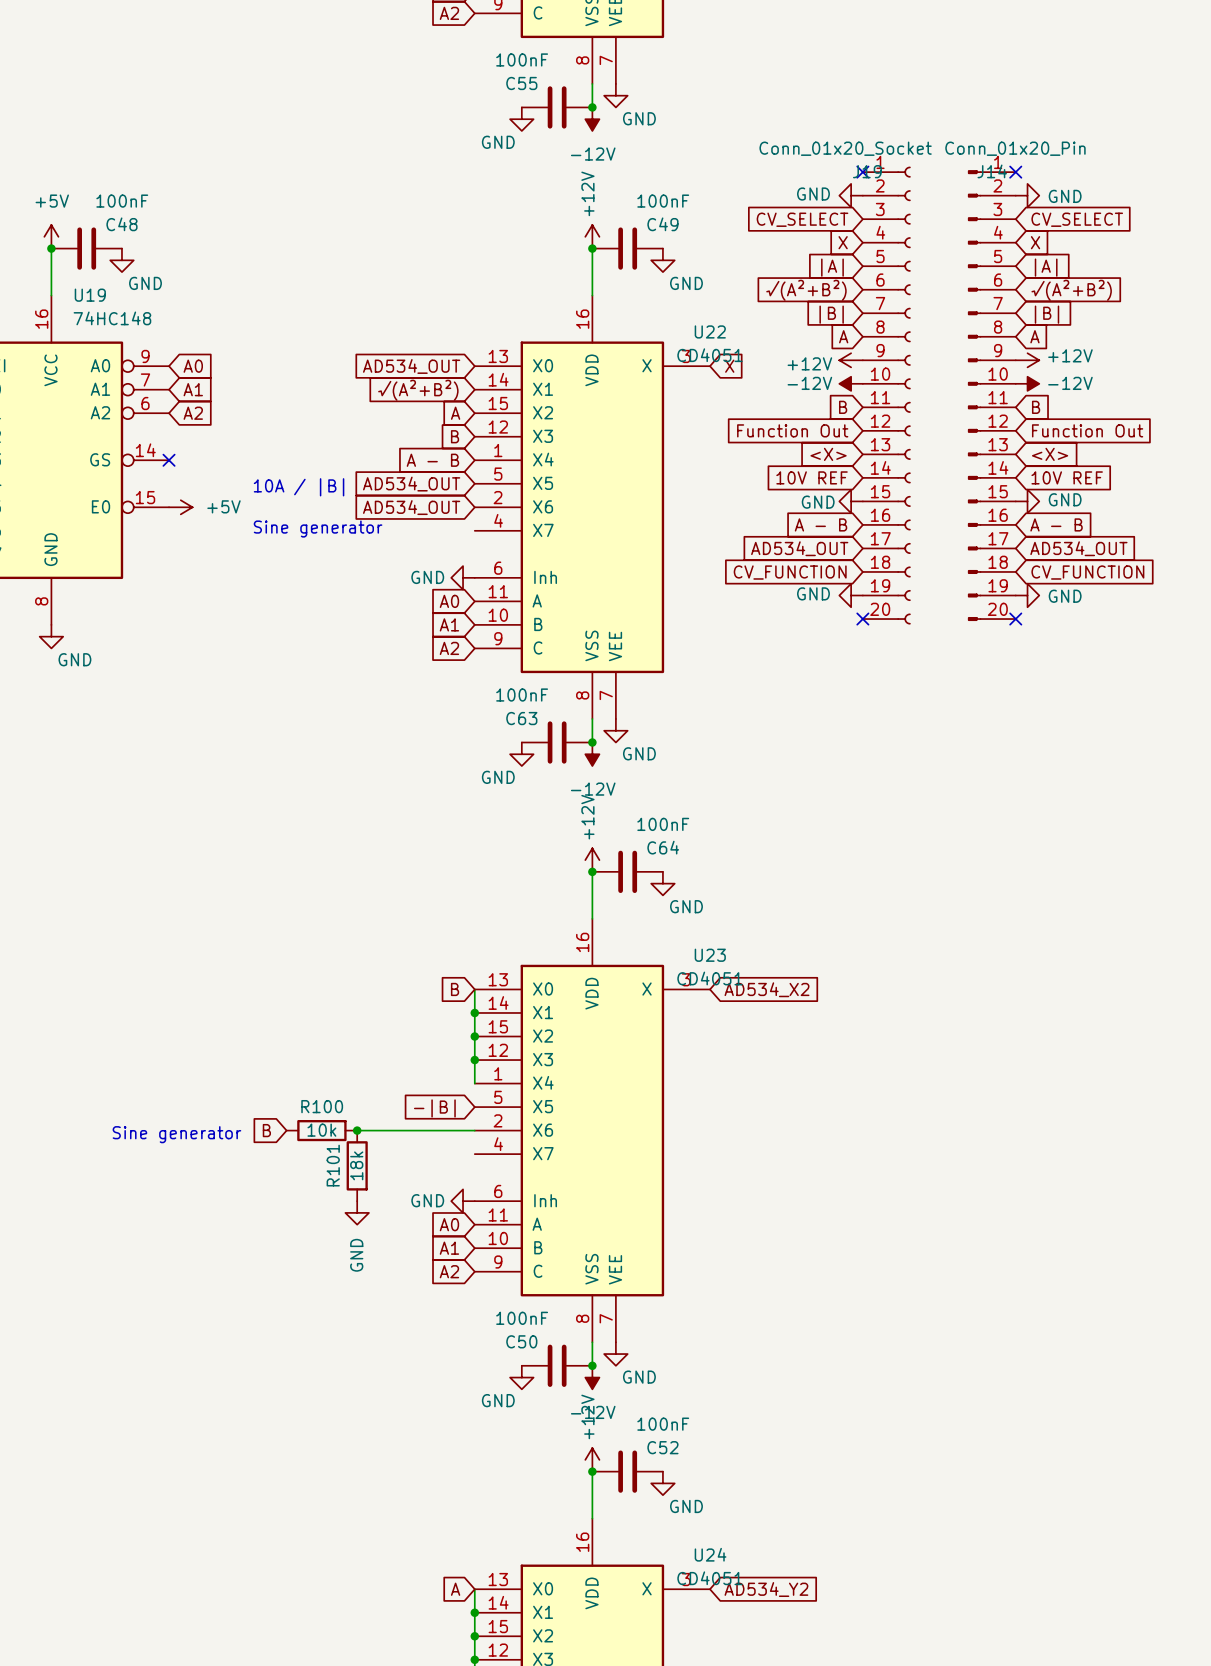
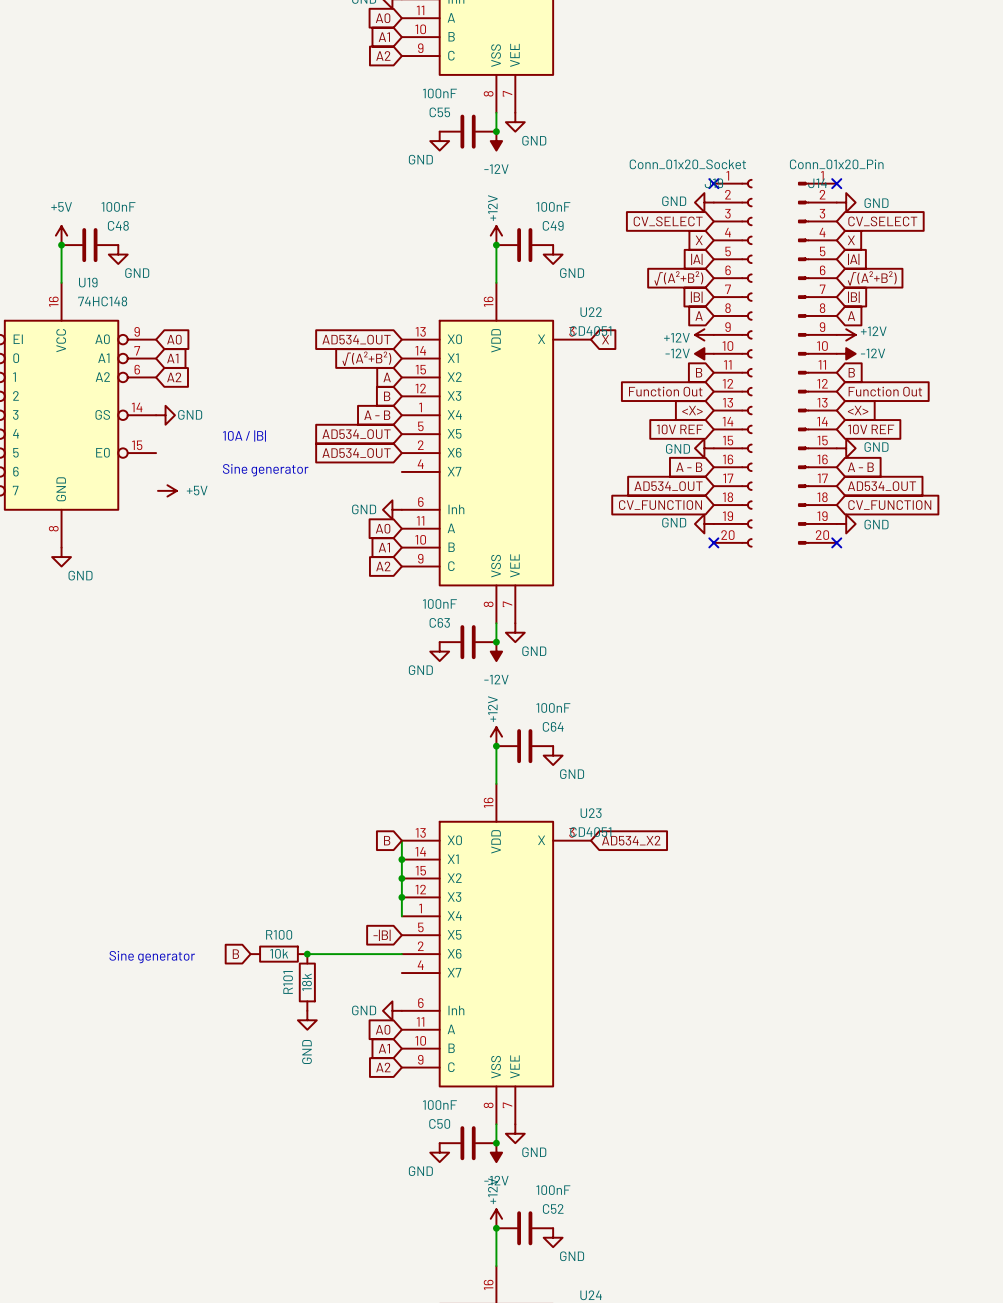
no-connect mark: (169, 460) -> none
power symbol: none -> GND (165, 415)
power symbol position: +5V (180, 507) -> +5V (167, 490)

